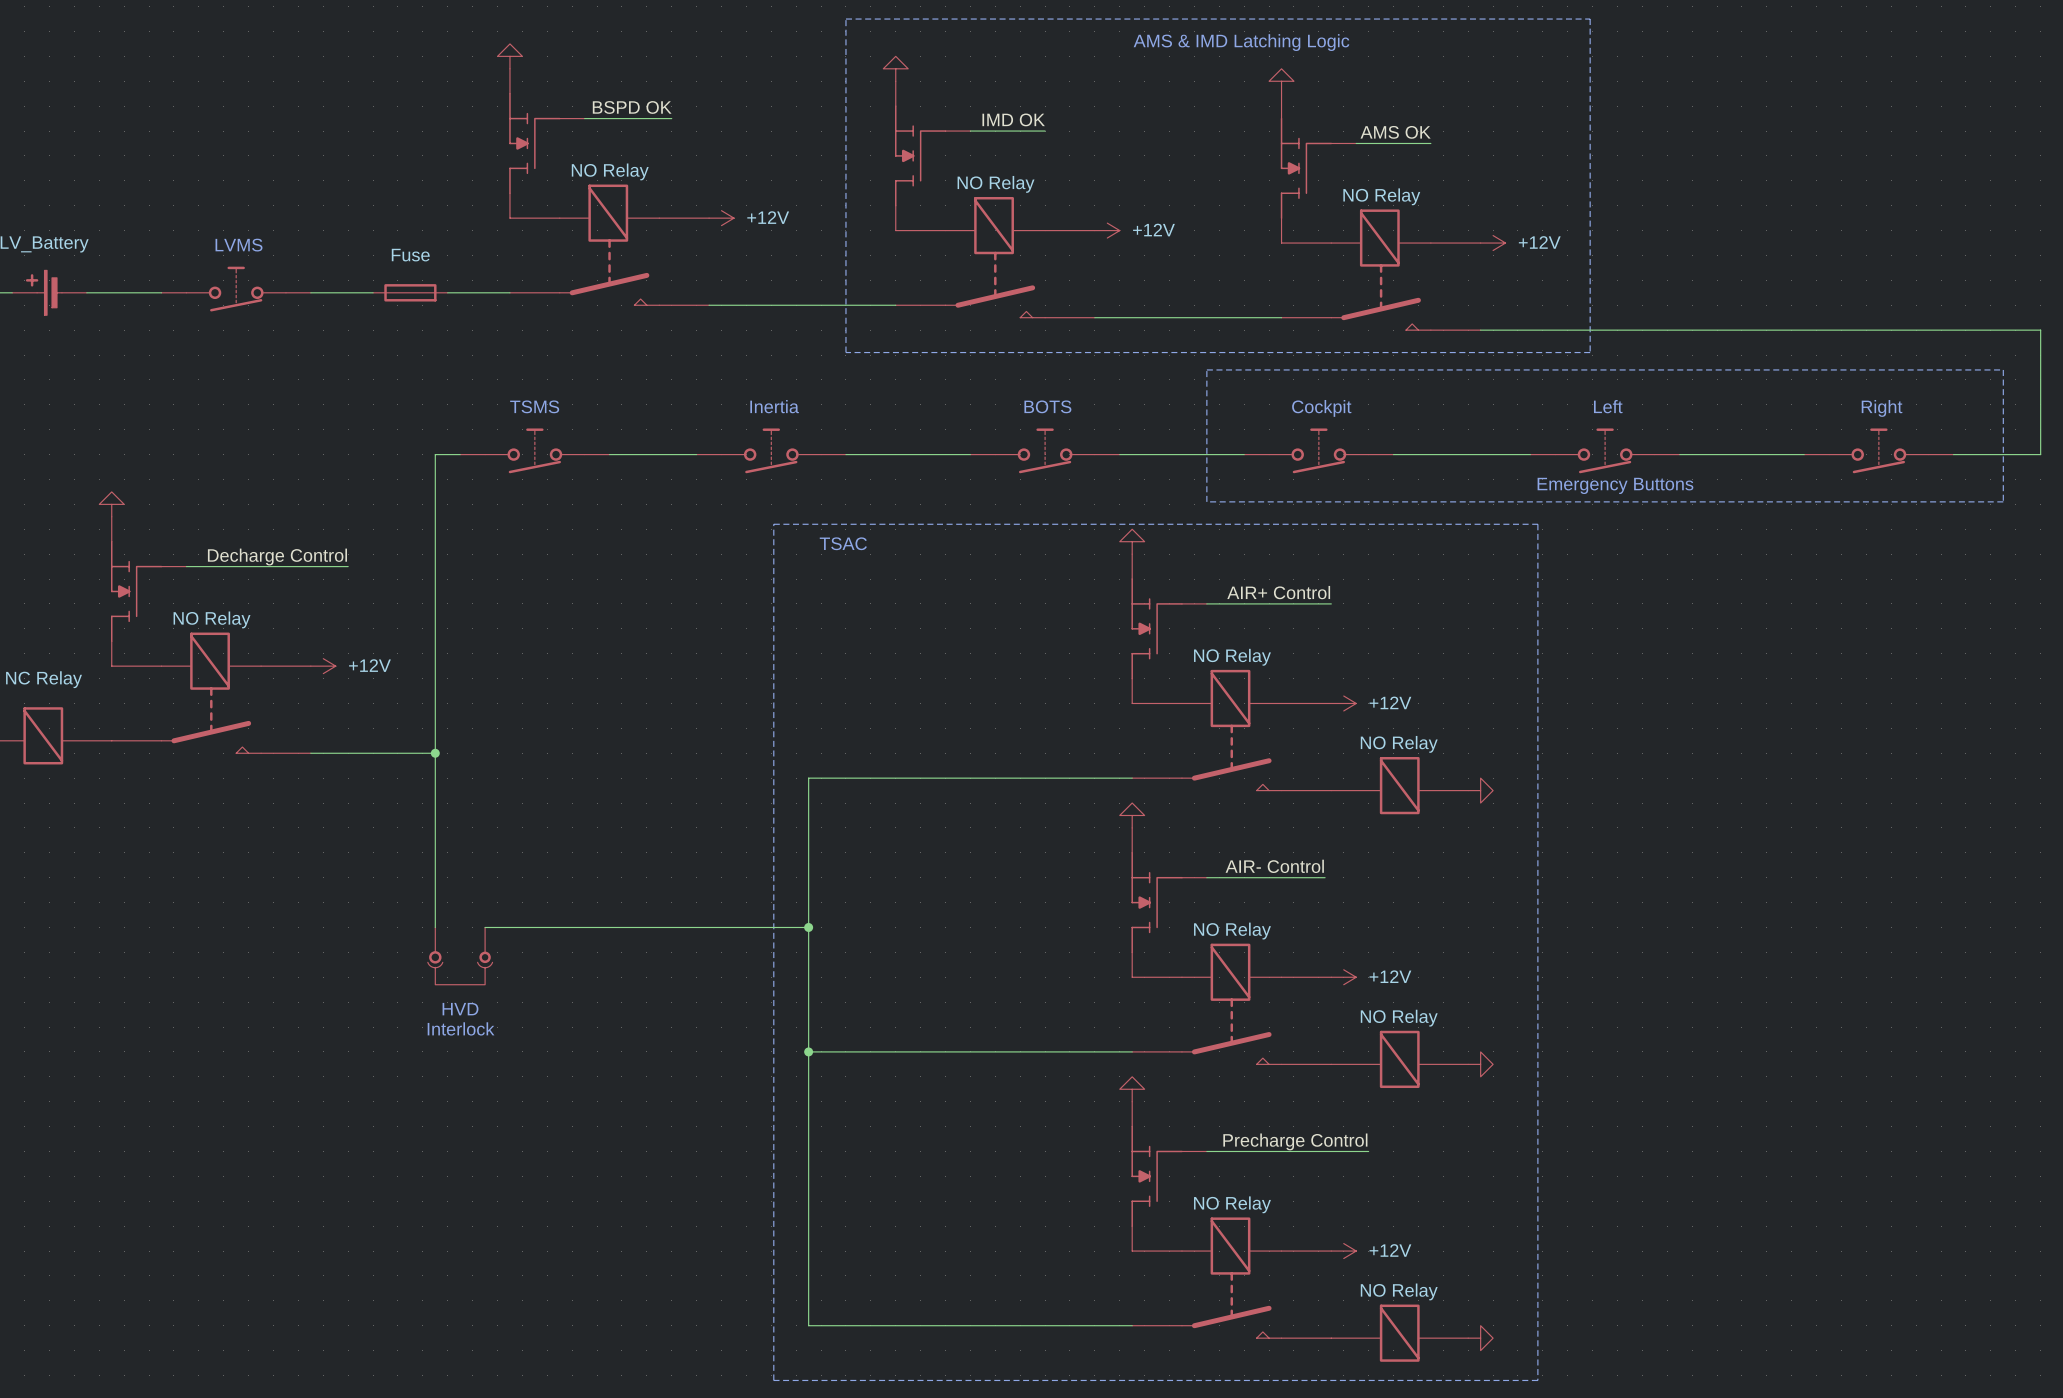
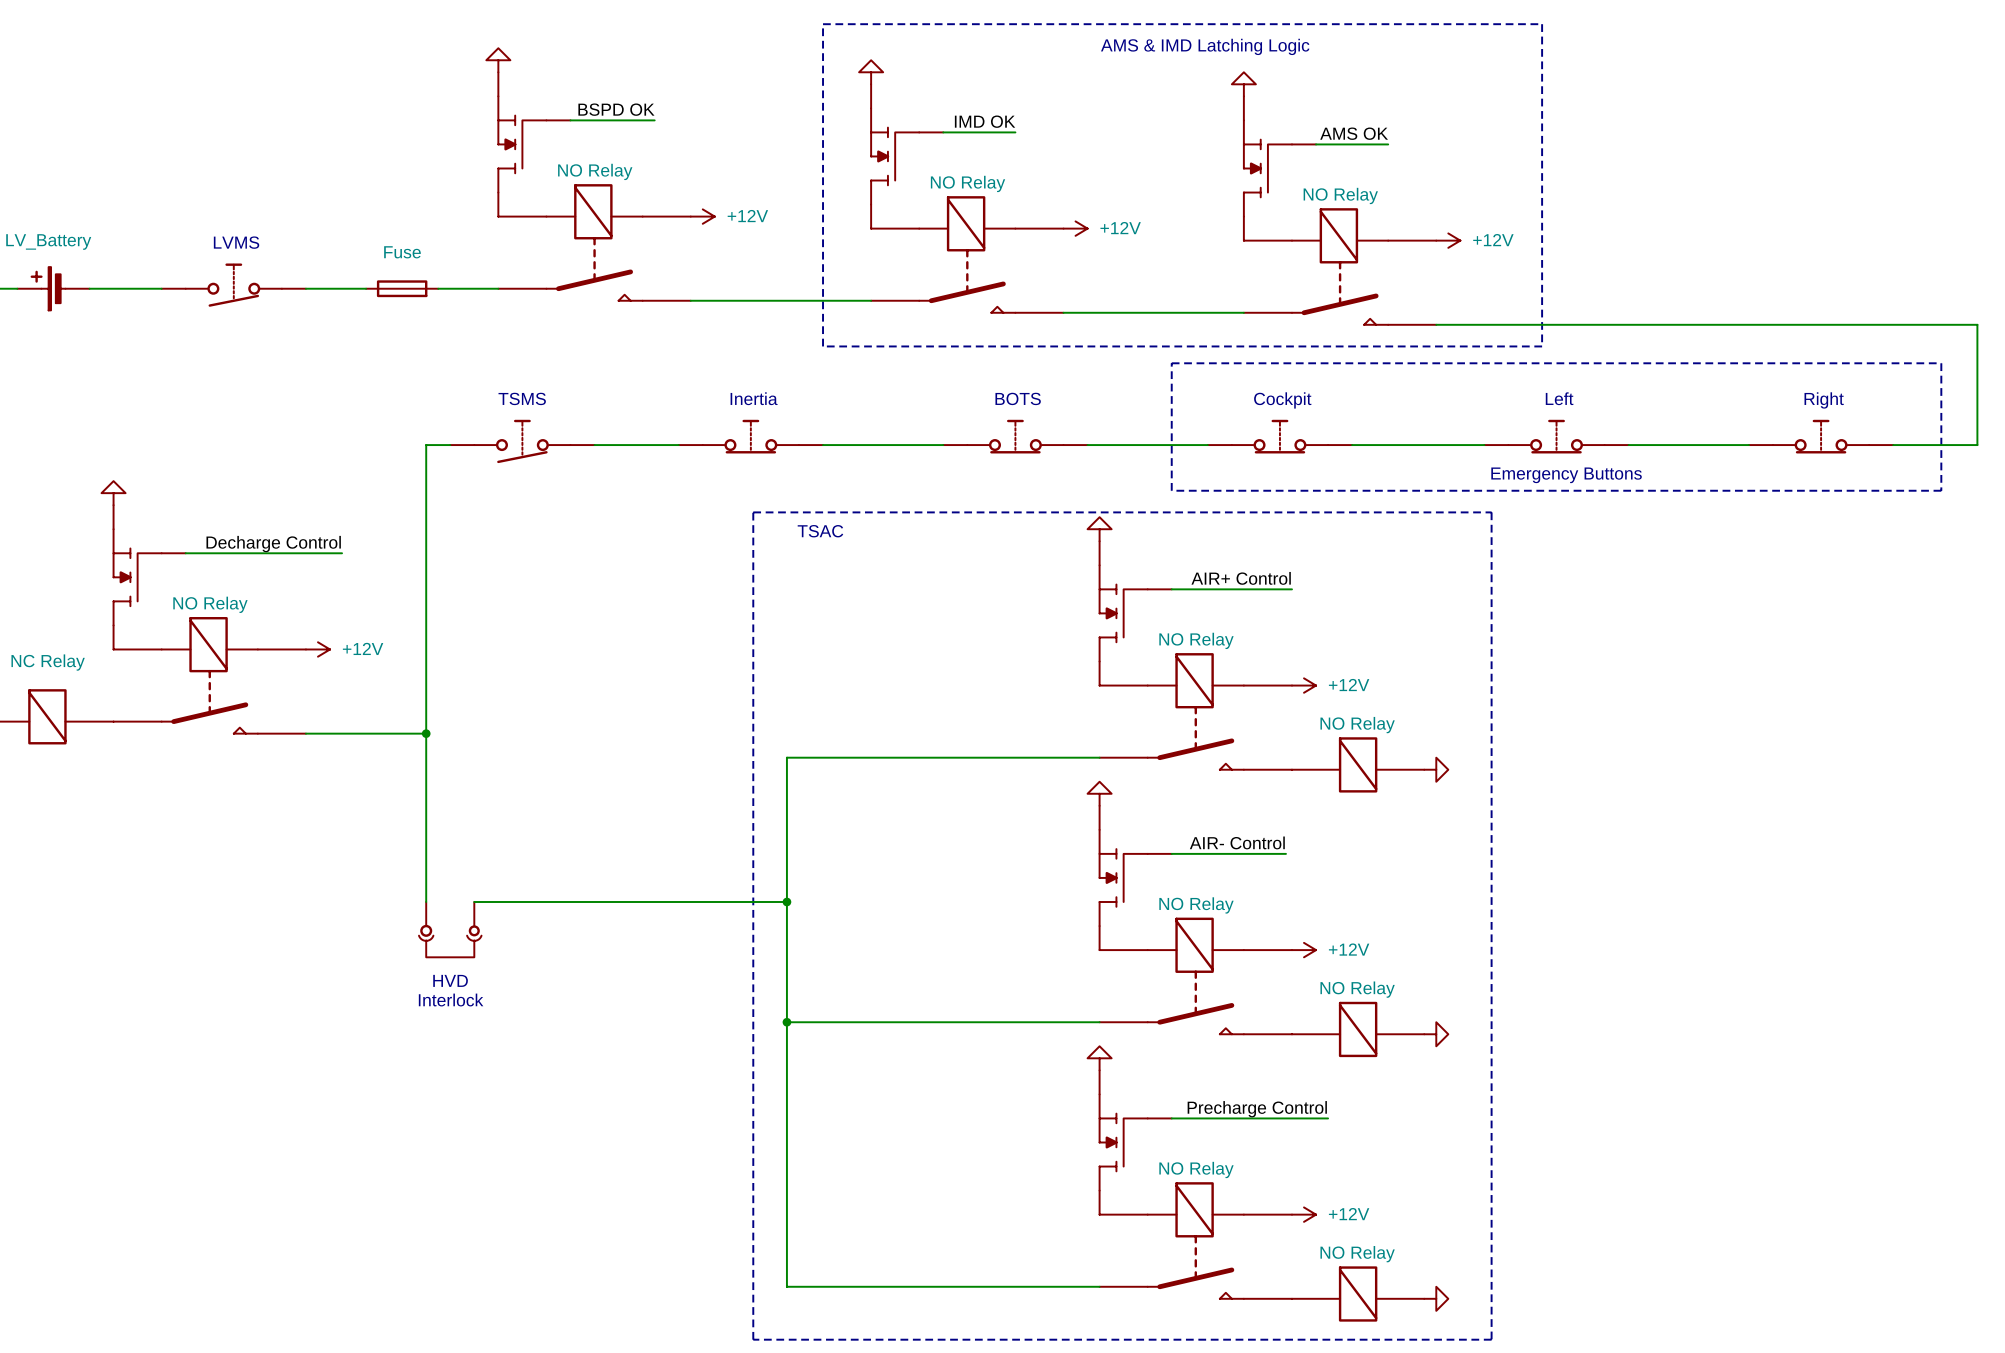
part symbol: [696, 428, 846, 474] -> [678, 419, 824, 454]
part symbol: [970, 428, 1120, 474] -> [943, 419, 1088, 454]
part symbol: [1244, 428, 1394, 474] -> [1207, 419, 1353, 454]
part symbol: [1530, 428, 1680, 474] -> [1484, 419, 1629, 454]
part symbol: [1804, 428, 1954, 474] -> [1748, 419, 1894, 454]

